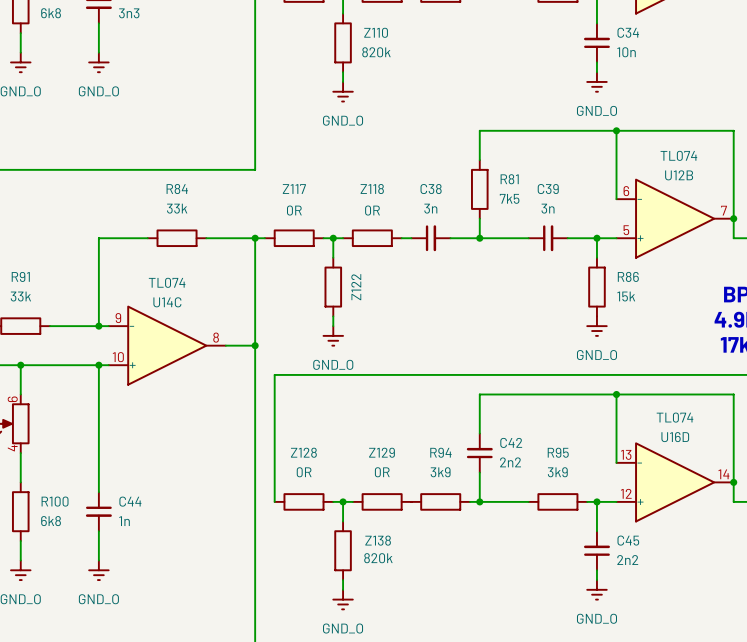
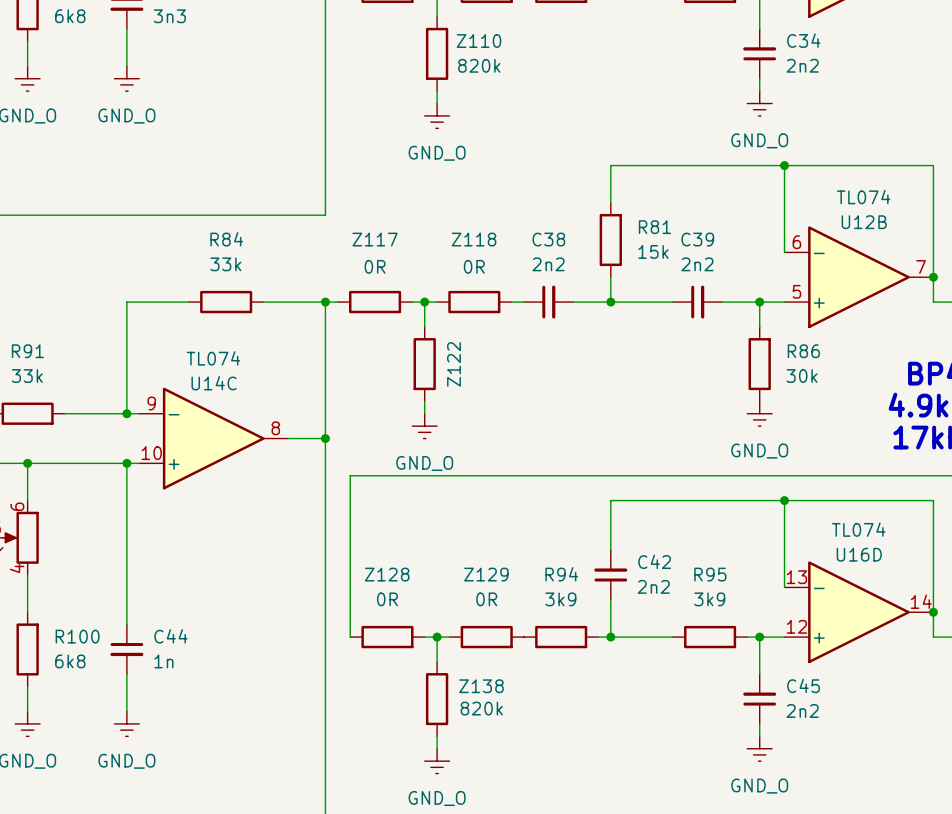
C34 value: 10n (626, 52) -> 2n2 (802, 65)
R81 value: 7k5 (509, 198) -> 15k (653, 251)
C38 value: 3n (430, 208) -> 2n2 (548, 264)
C39 value: 3n (548, 208) -> 2n2 (697, 264)
R86 value: 15k (626, 296) -> 30k (802, 376)

